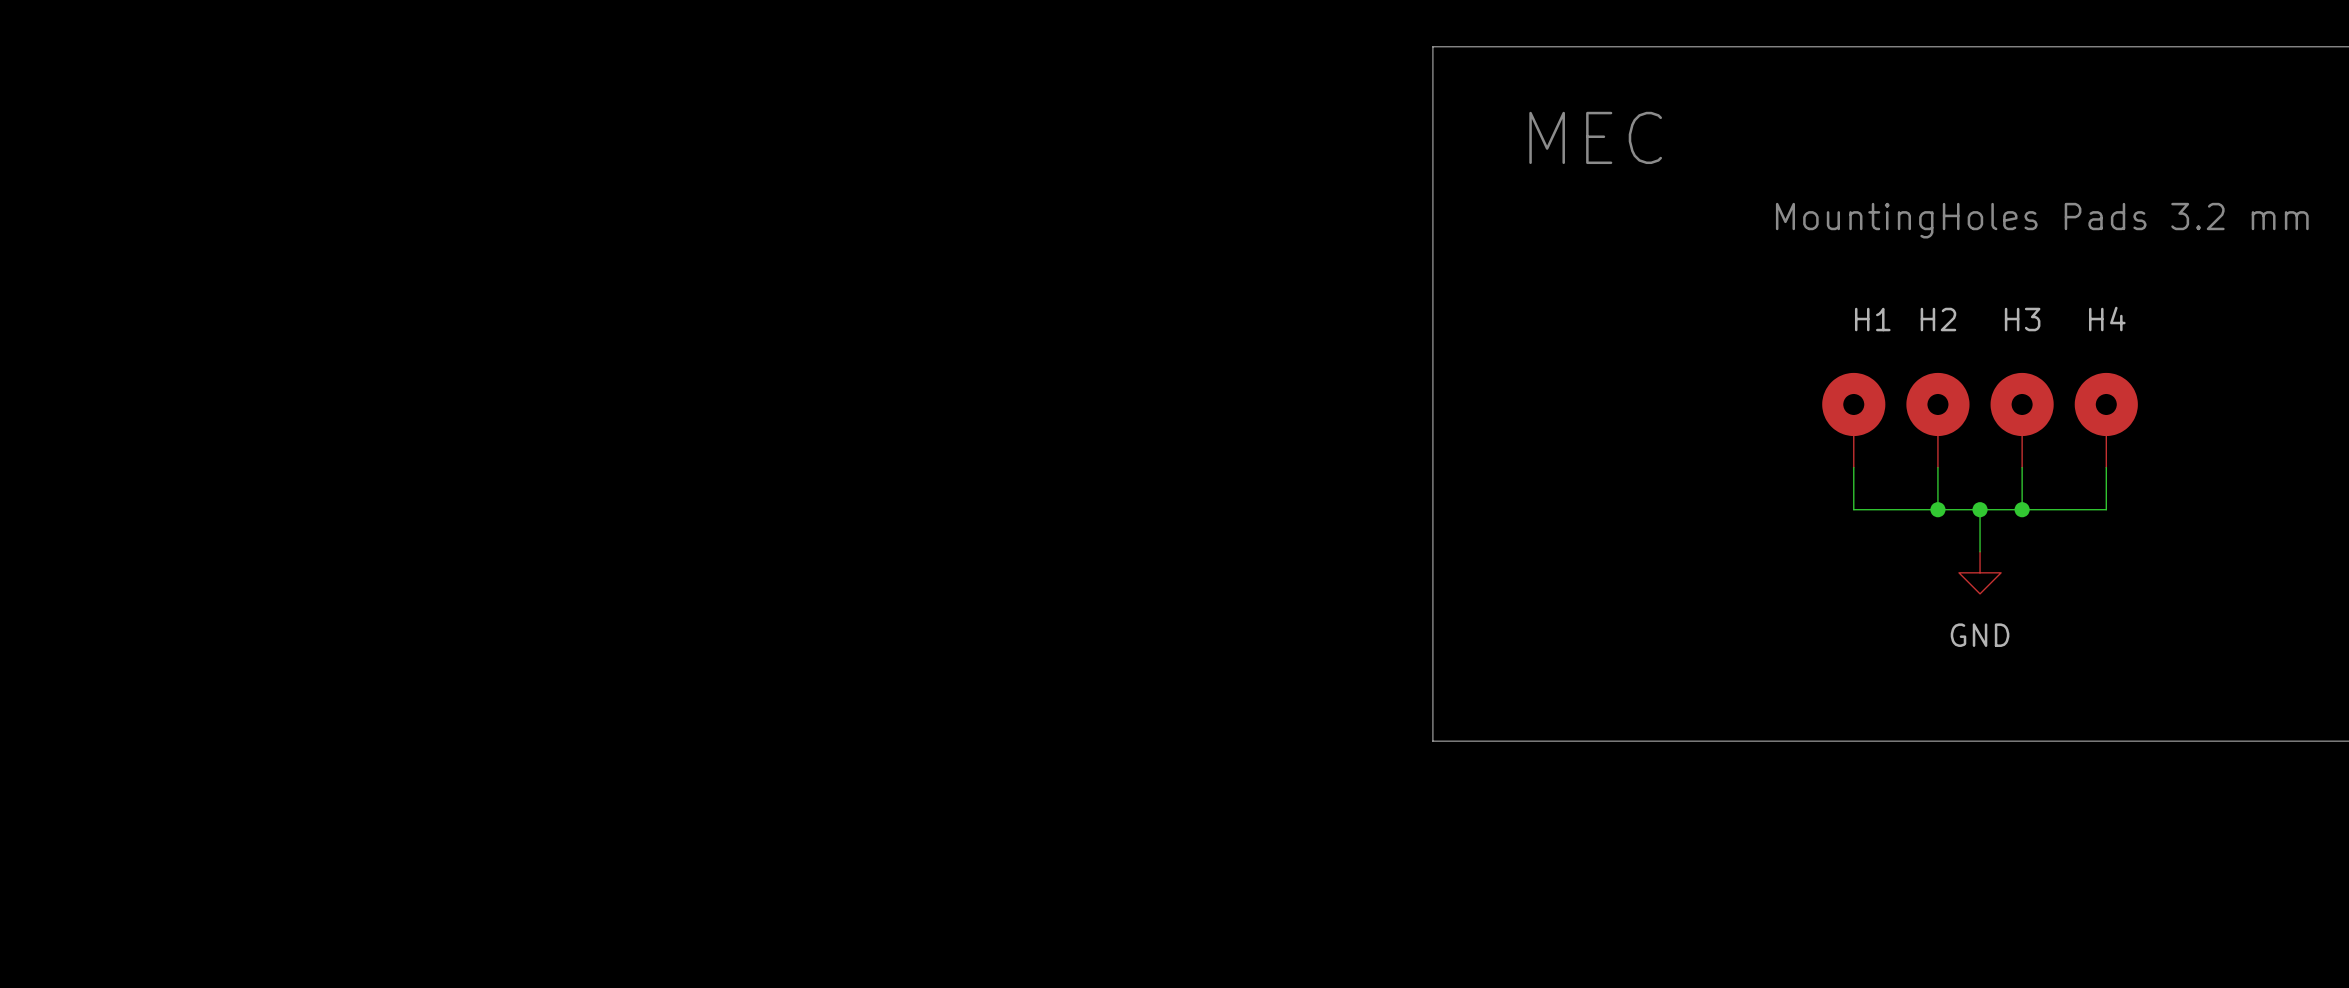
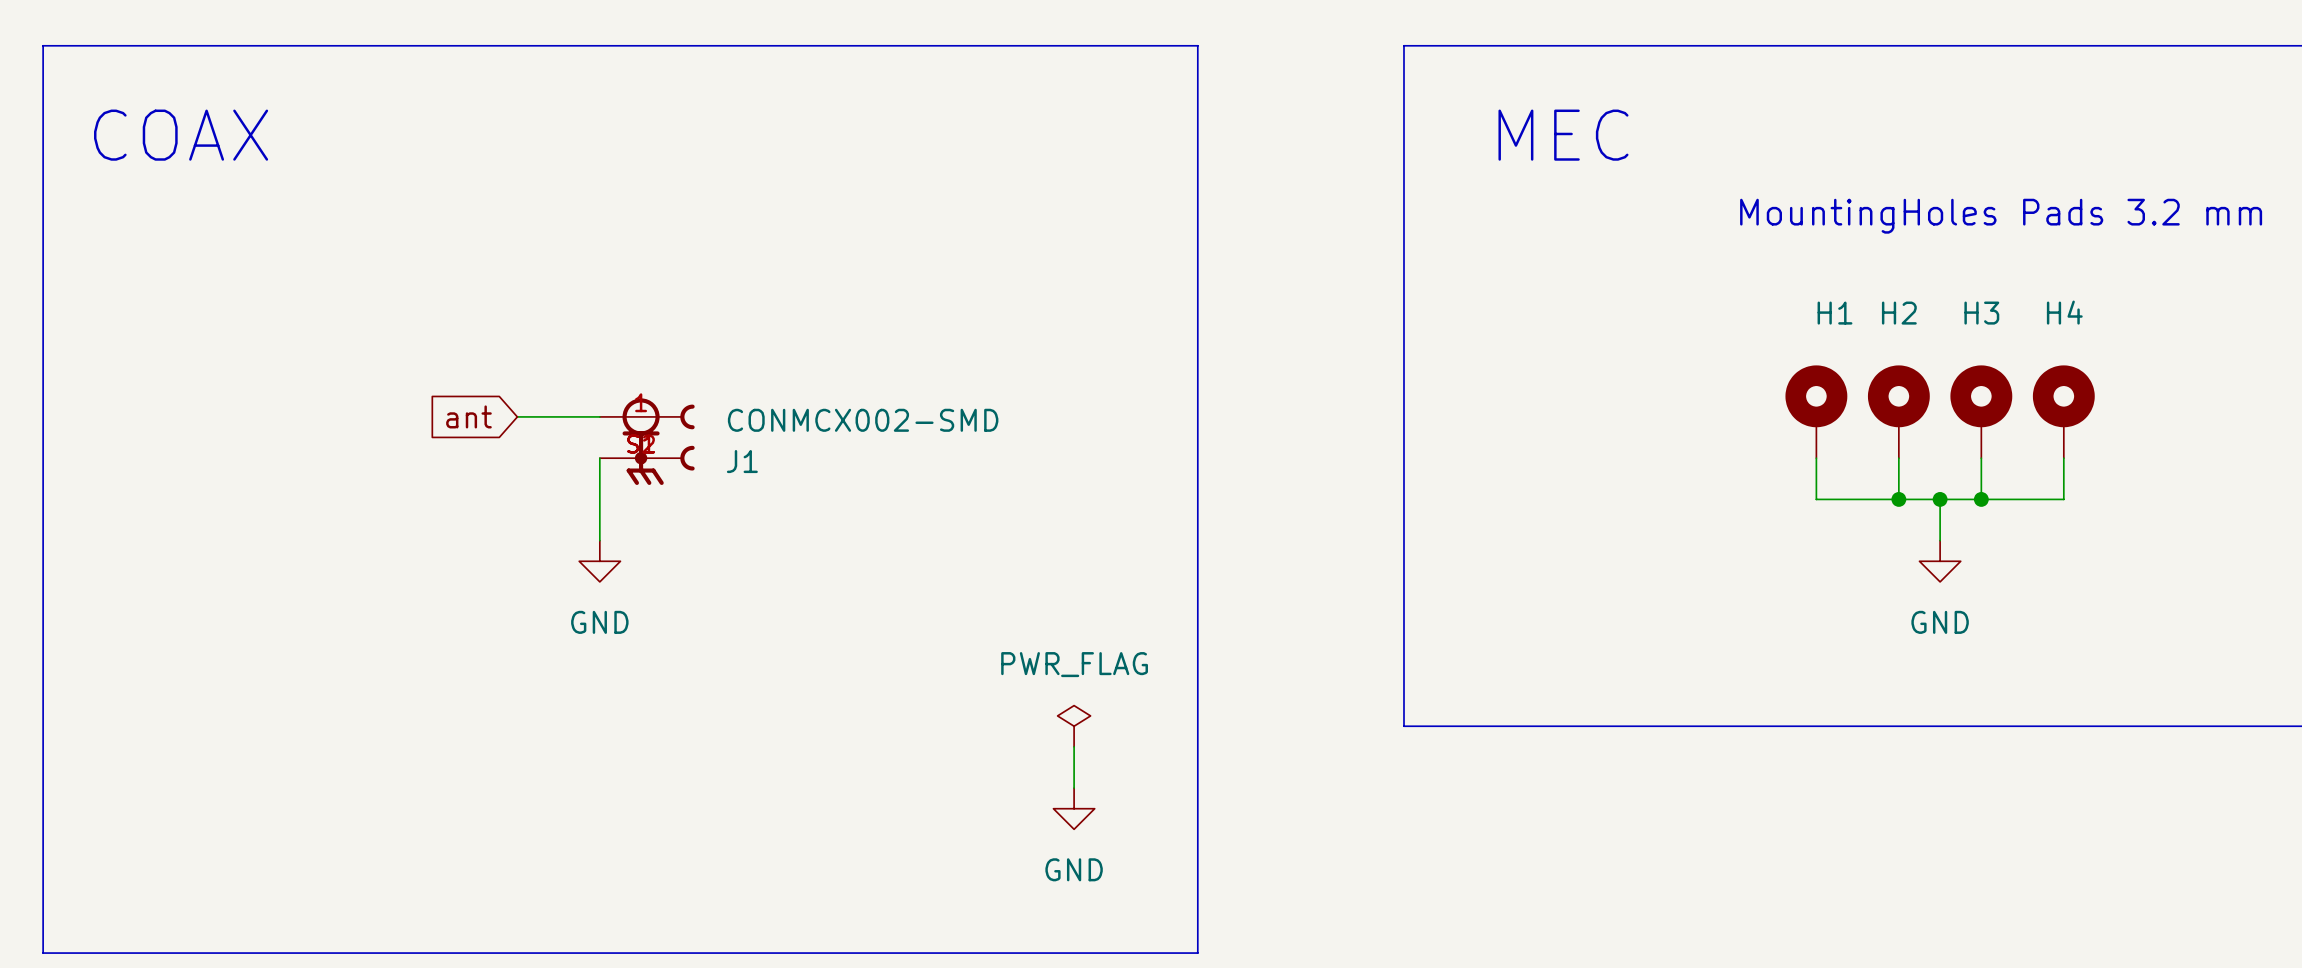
line: none -> (43, 45) (1197, 45) (1197, 953) (43, 953) (43, 45)
text: none -> COAX (181, 135)
global label: none -> ant (468, 416)
wire: none -> (517, 416) (599, 416)
J1: none -> CONMCX002-SMD (647, 441)
wire: none -> (599, 458) (599, 540)
power symbol: none -> GND (599, 561)
power symbol: none -> PWR_FLAG (1074, 726)
wire: none -> (1074, 746) (1074, 788)
power symbol: none -> GND (1074, 808)

